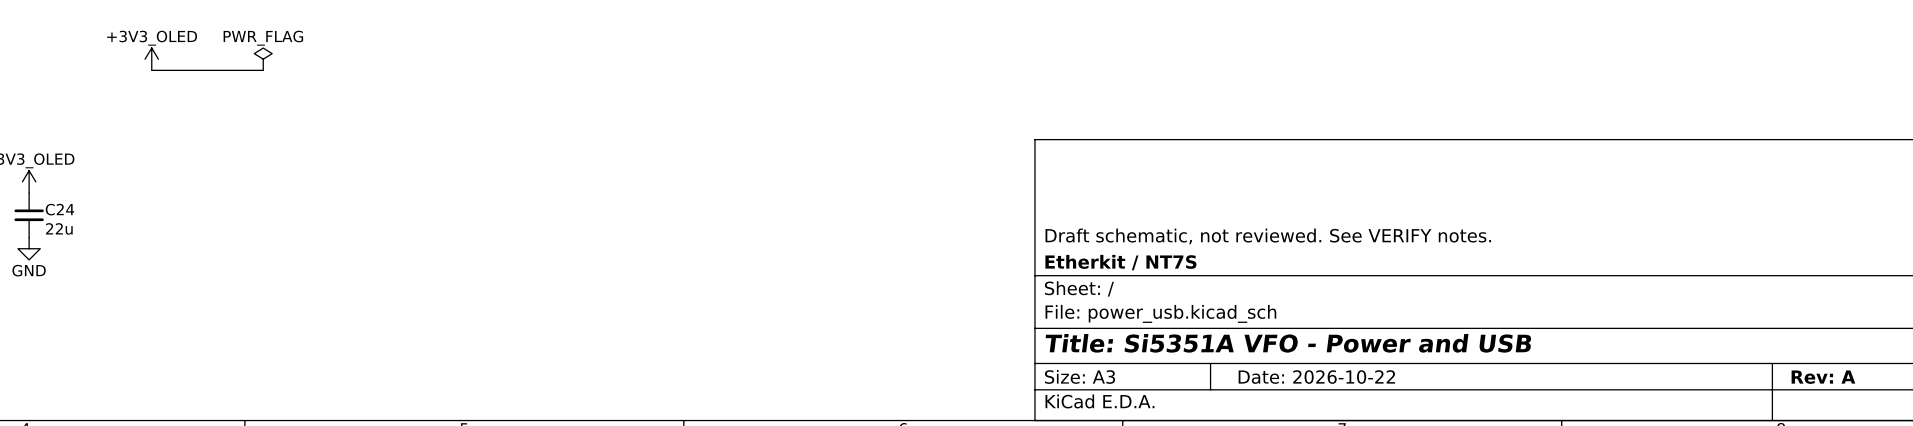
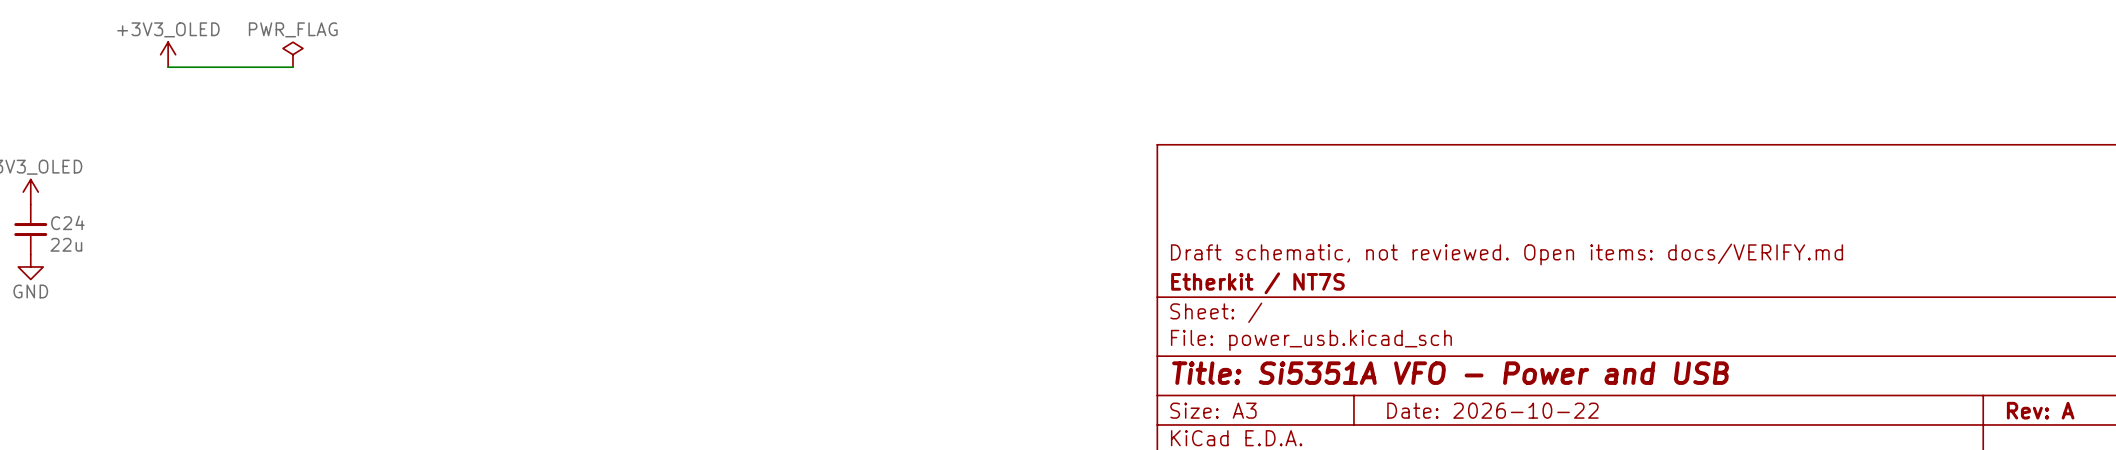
title block: Draft schematic, not reviewed. See VERIFY notes. (1268, 236) -> Draft schematic, not reviewed. Open items: docs/VERIFY.md (1507, 254)

